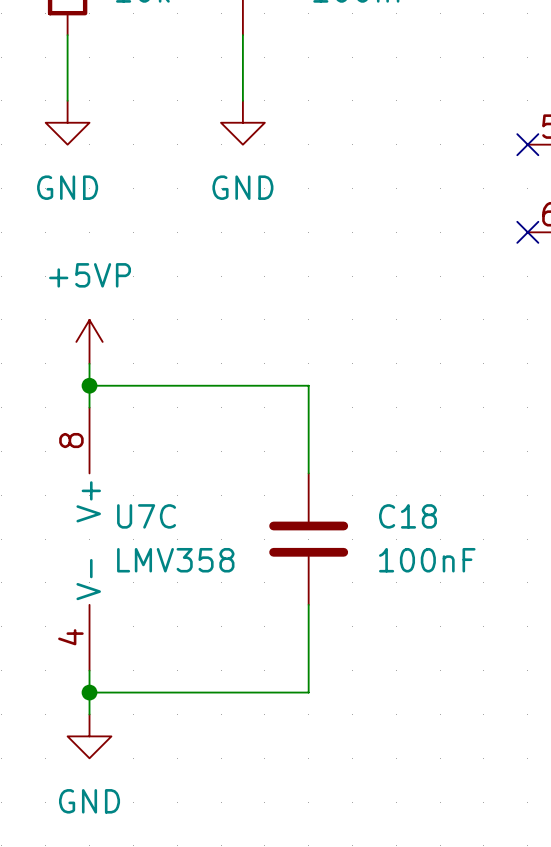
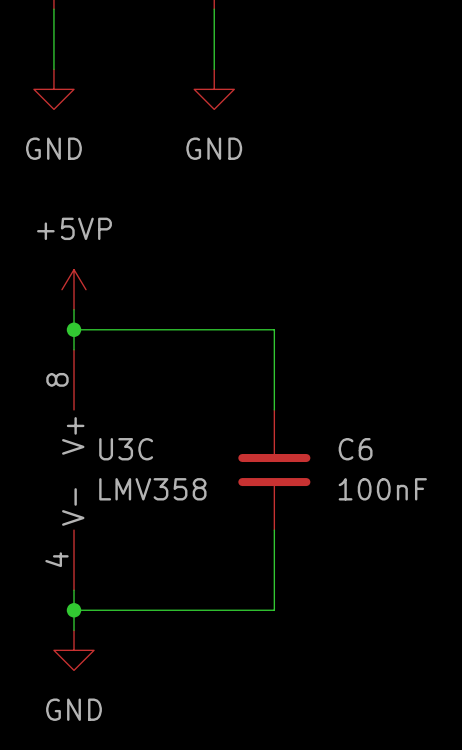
U7C name: U7C (146, 516) -> U3C (126, 449)
C18 name: C18 (407, 516) -> C6 (355, 449)

